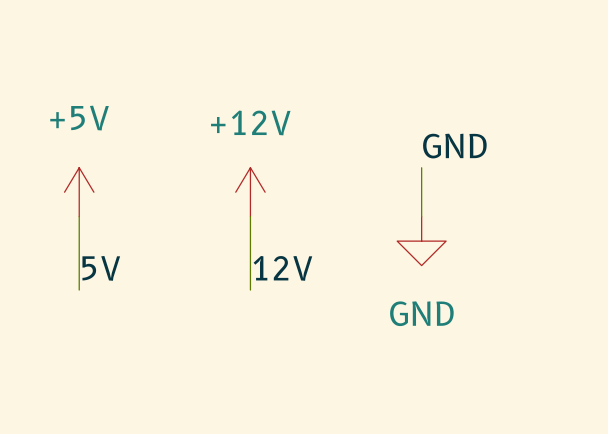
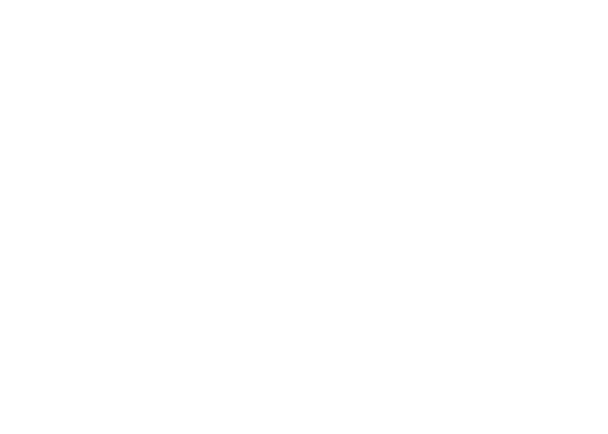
label: GND (454, 146) -> none
wire: (421, 167) (421, 216) -> none
power symbol: +5V (79, 192) -> none
power symbol: +12V (250, 192) -> none
wire: (79, 216) (79, 290) -> none
wire: (250, 216) (250, 290) -> none
power symbol: GND (421, 241) -> none
label: 5V (101, 268) -> none
label: 12V (282, 268) -> none

